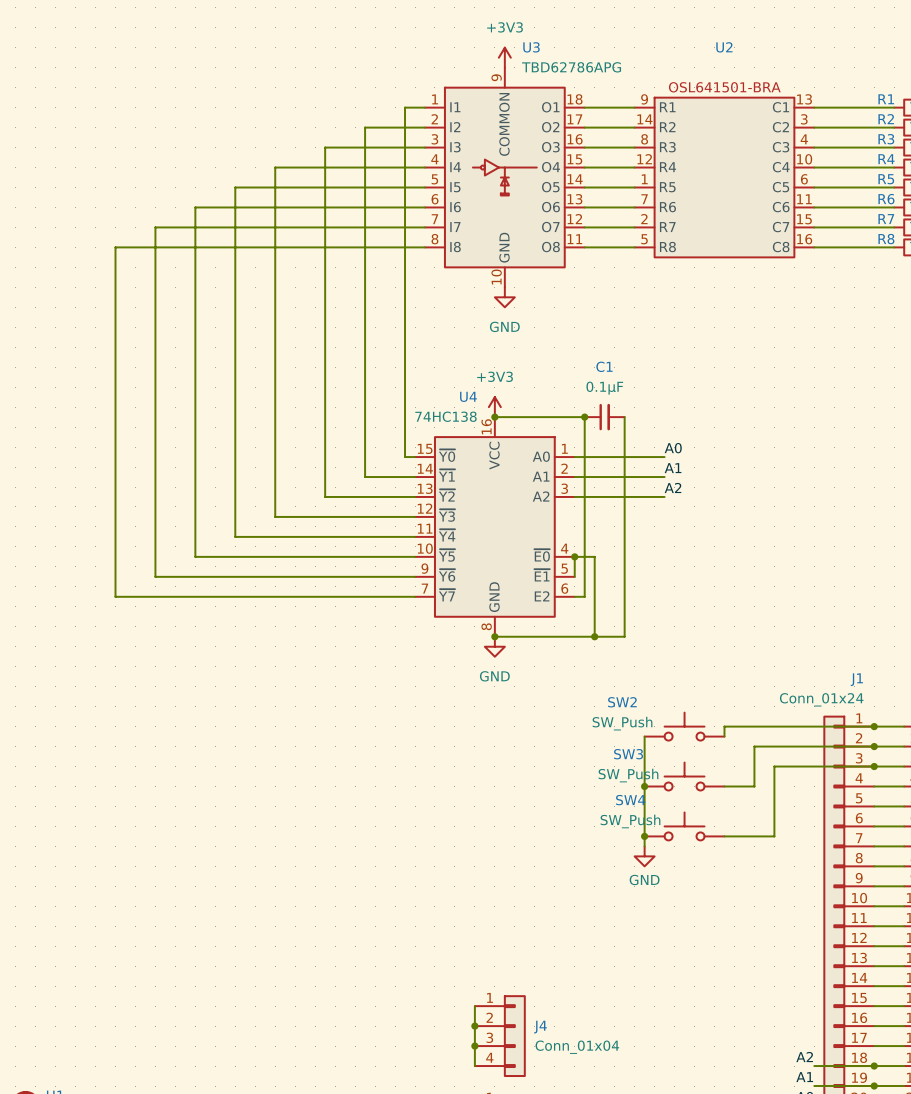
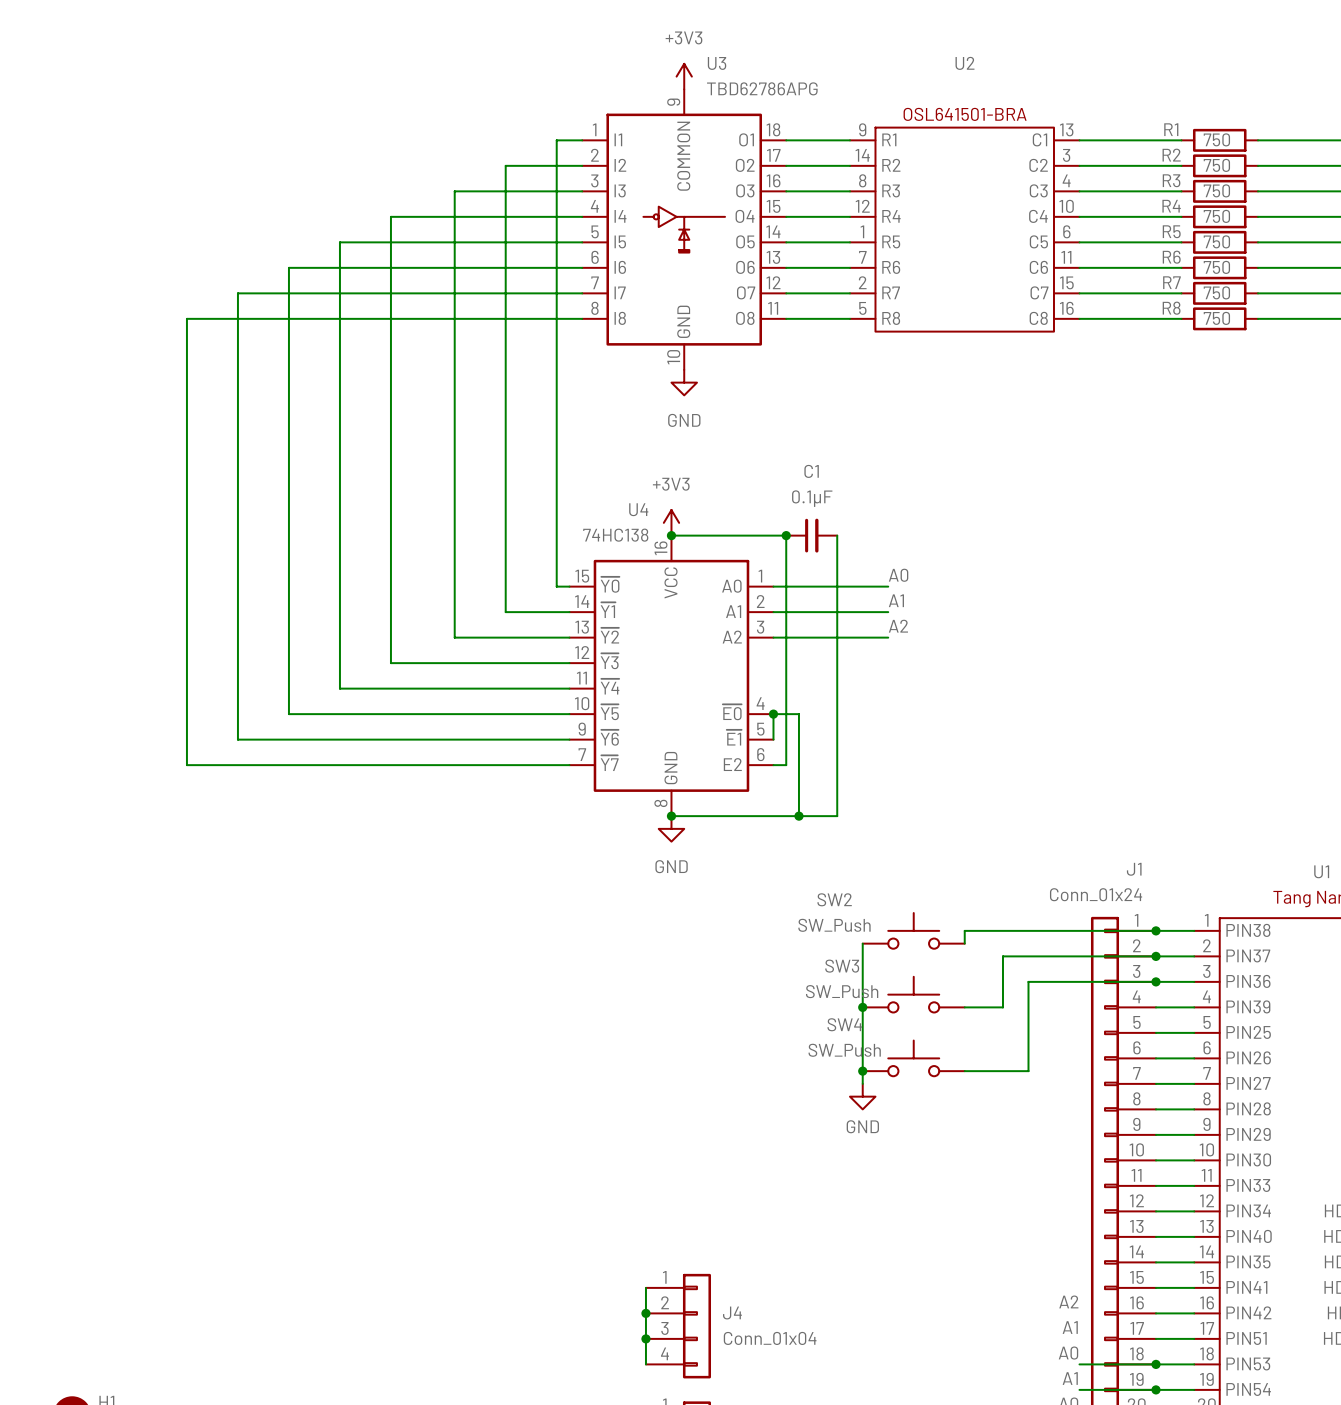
label: none -> A2 (1068, 1301)
label: none -> A1 (1070, 1327)
label: A2 (804, 1057) -> A0 (1068, 1353)

